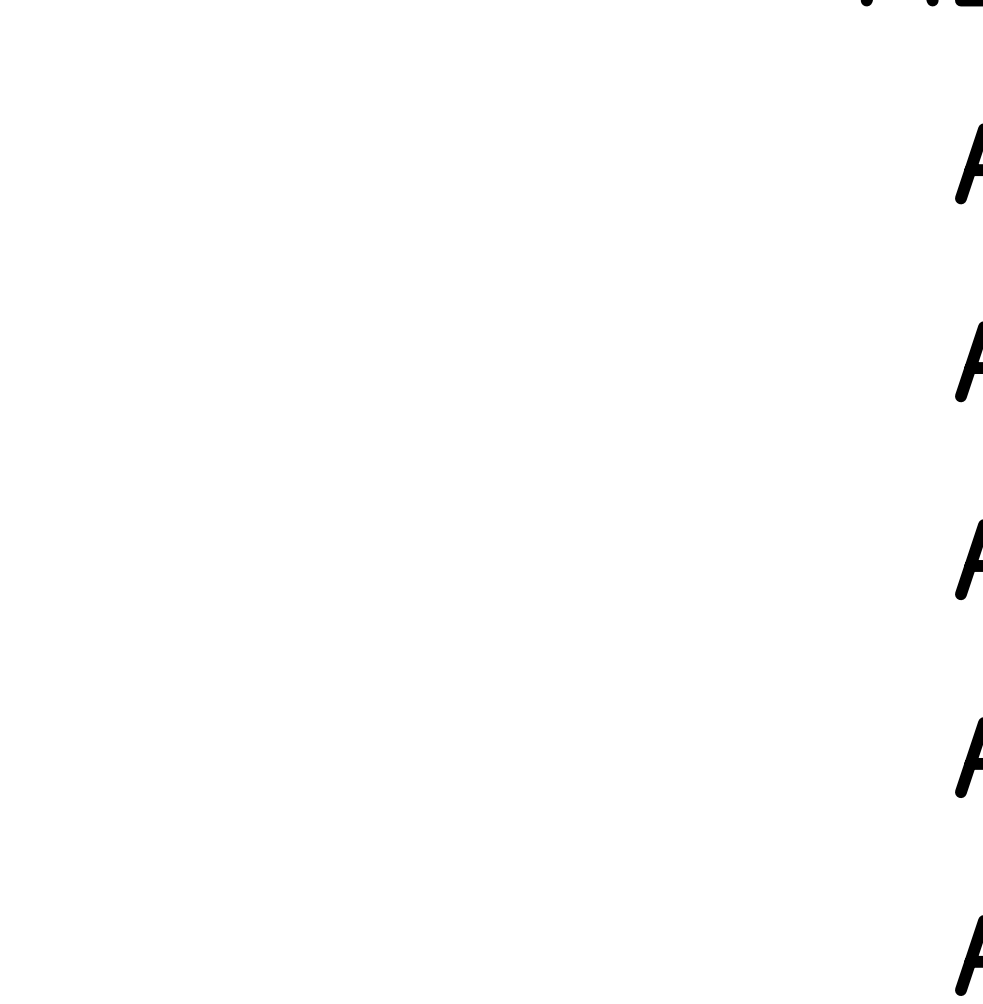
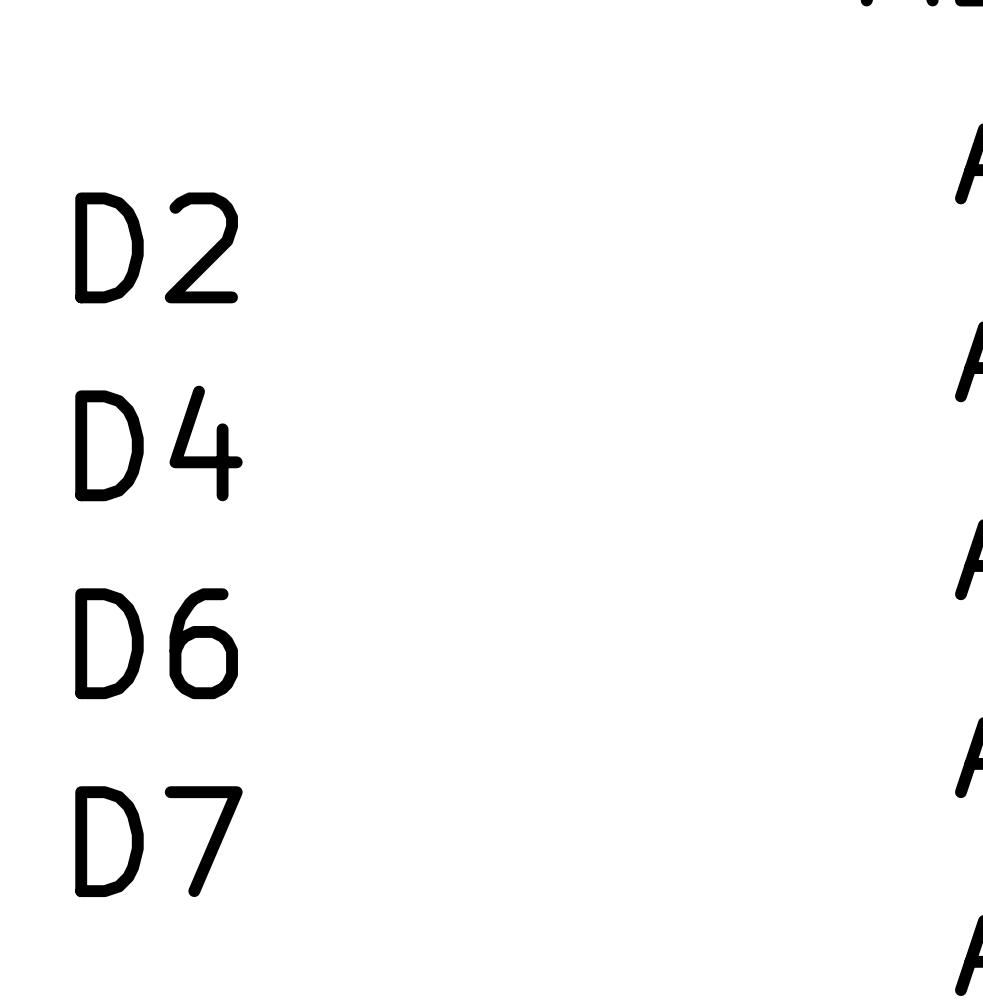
label: none -> D2 (156, 247)
label: none -> D4 (158, 443)
label: none -> D6 (156, 643)
label: none -> D7 (158, 841)

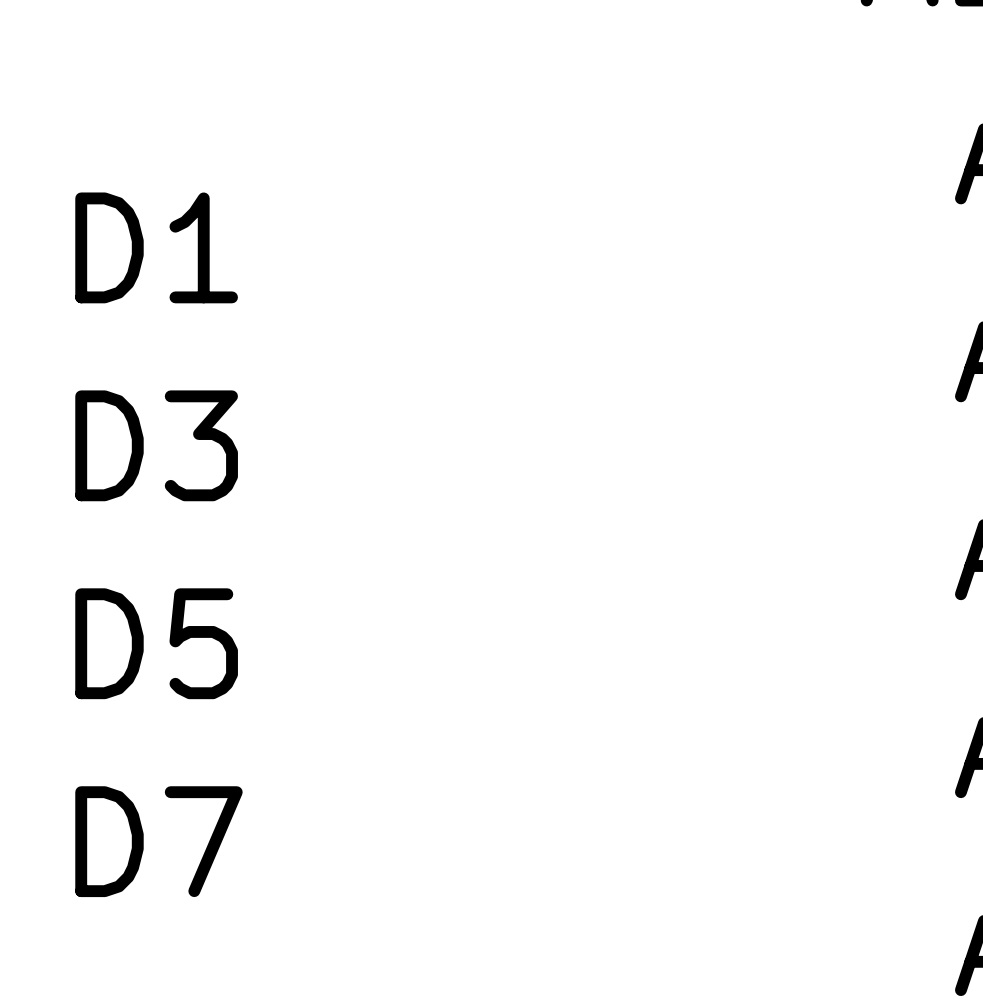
label: D2 (156, 247) -> D1 (156, 247)
label: D4 (158, 443) -> D3 (156, 445)
label: D6 (156, 643) -> D5 (156, 643)

